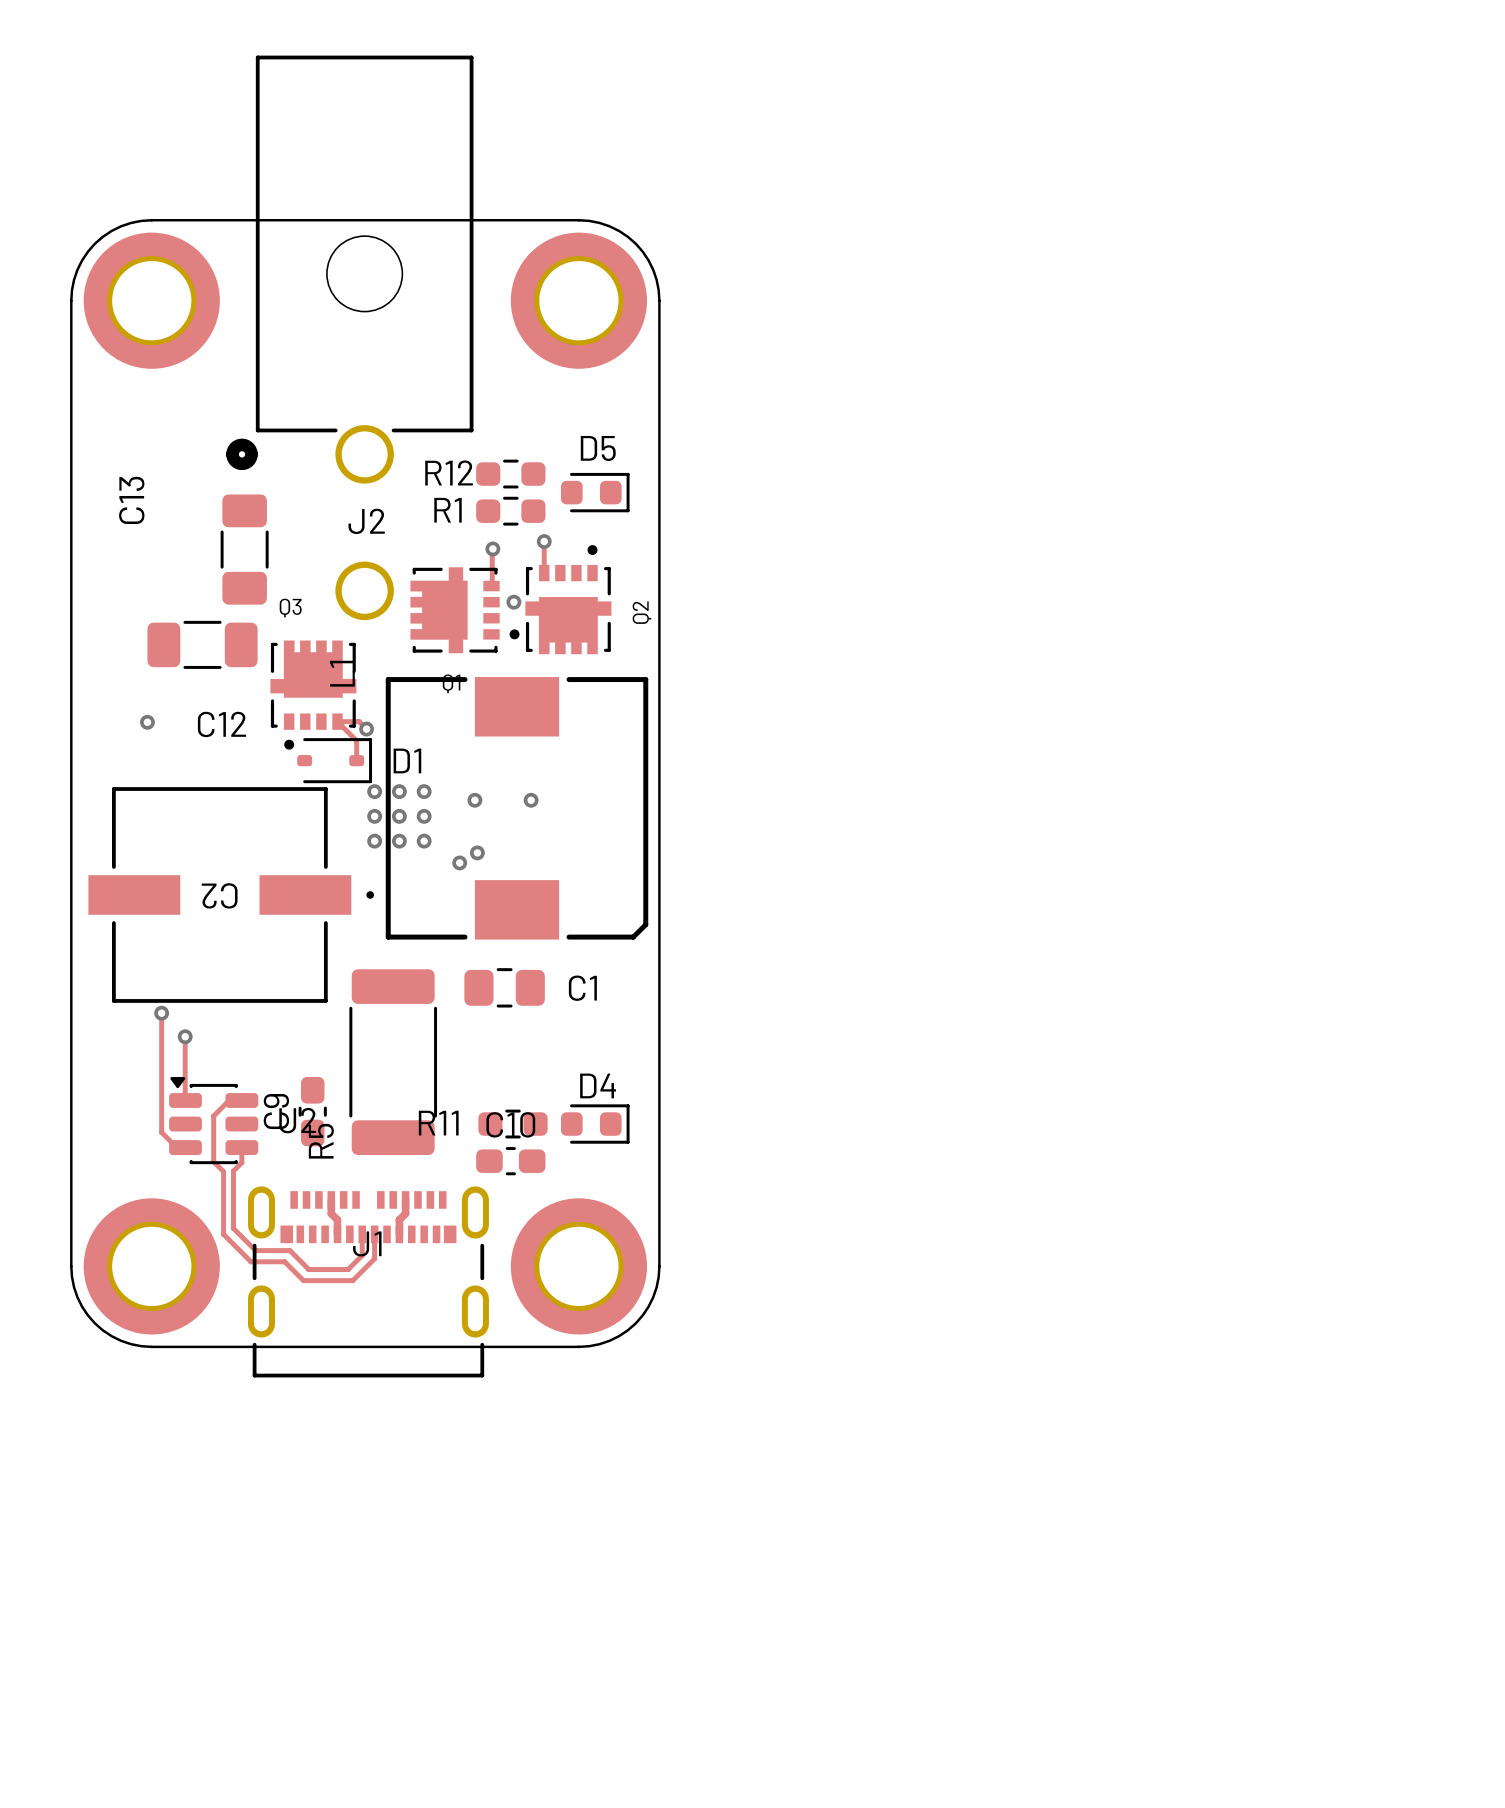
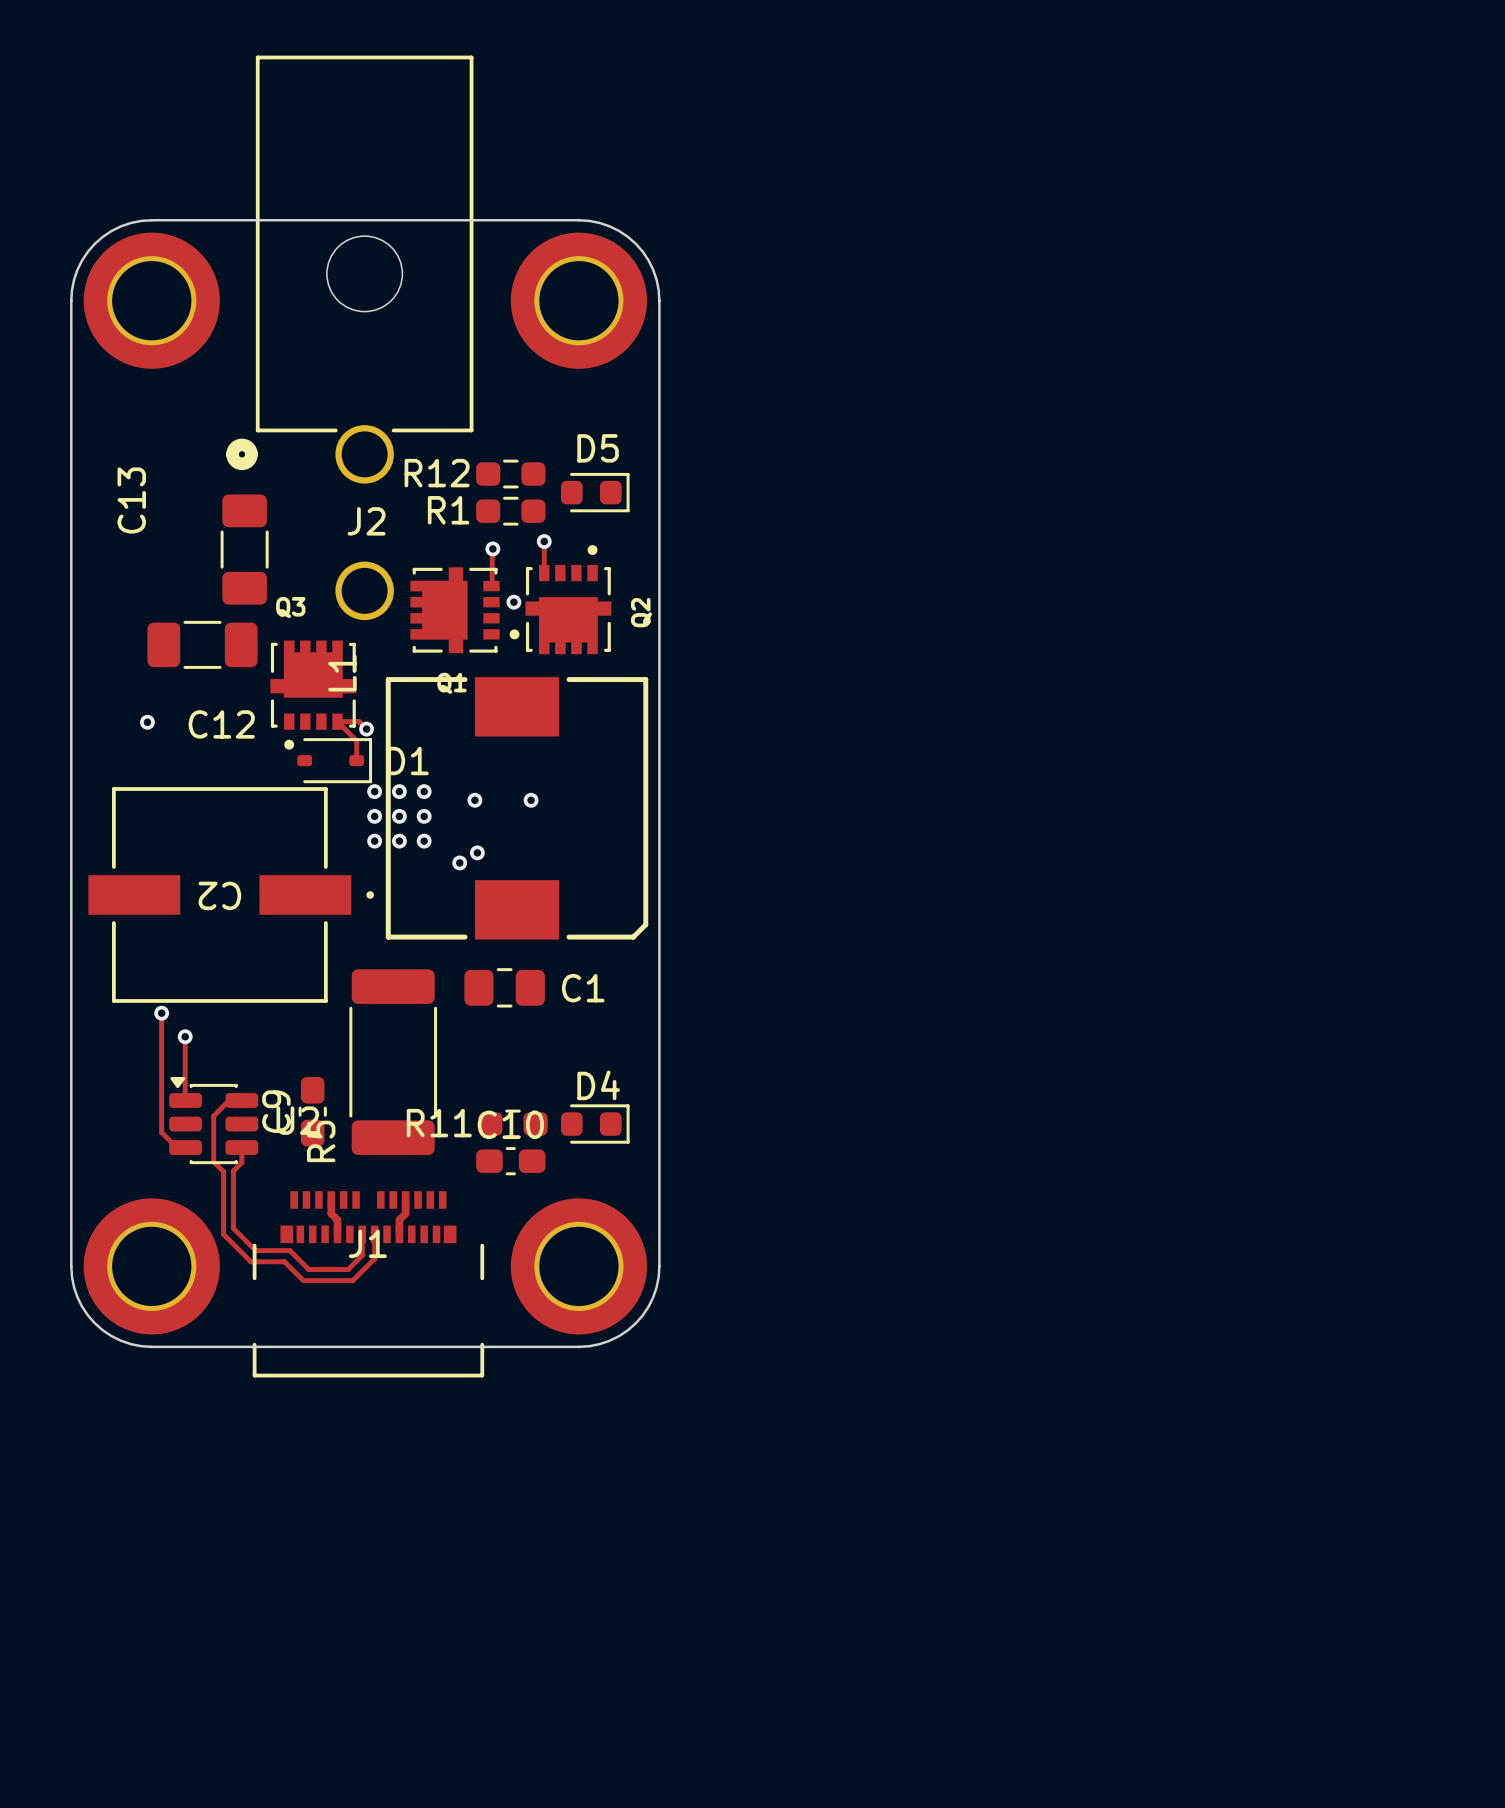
J1 footprint: [247, 1186, 489, 1378] -> [252, 1191, 485, 1378]

